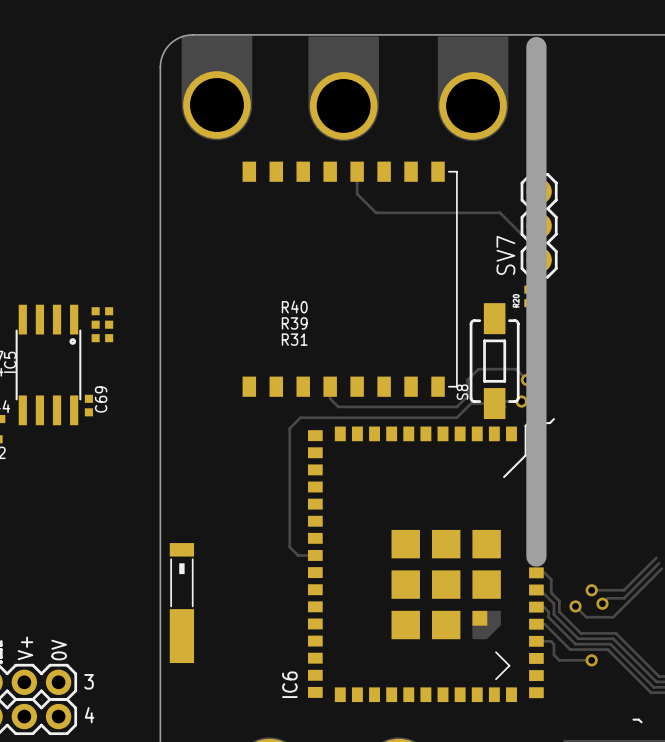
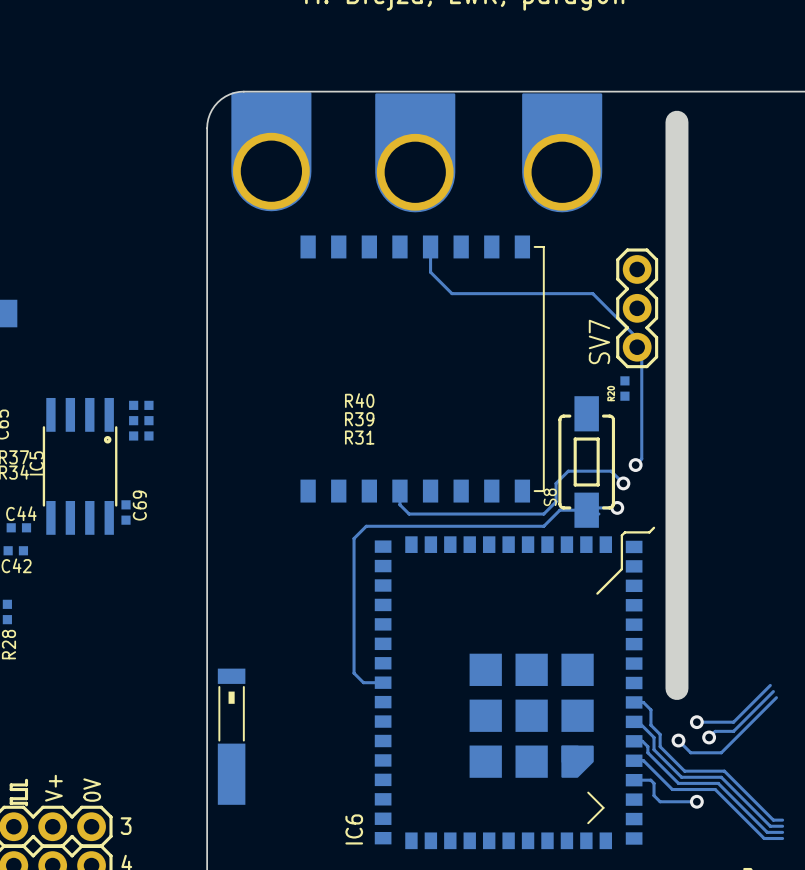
drawing: [526, 36, 547, 567] -> none
drawing: none -> [665, 110, 689, 700]

